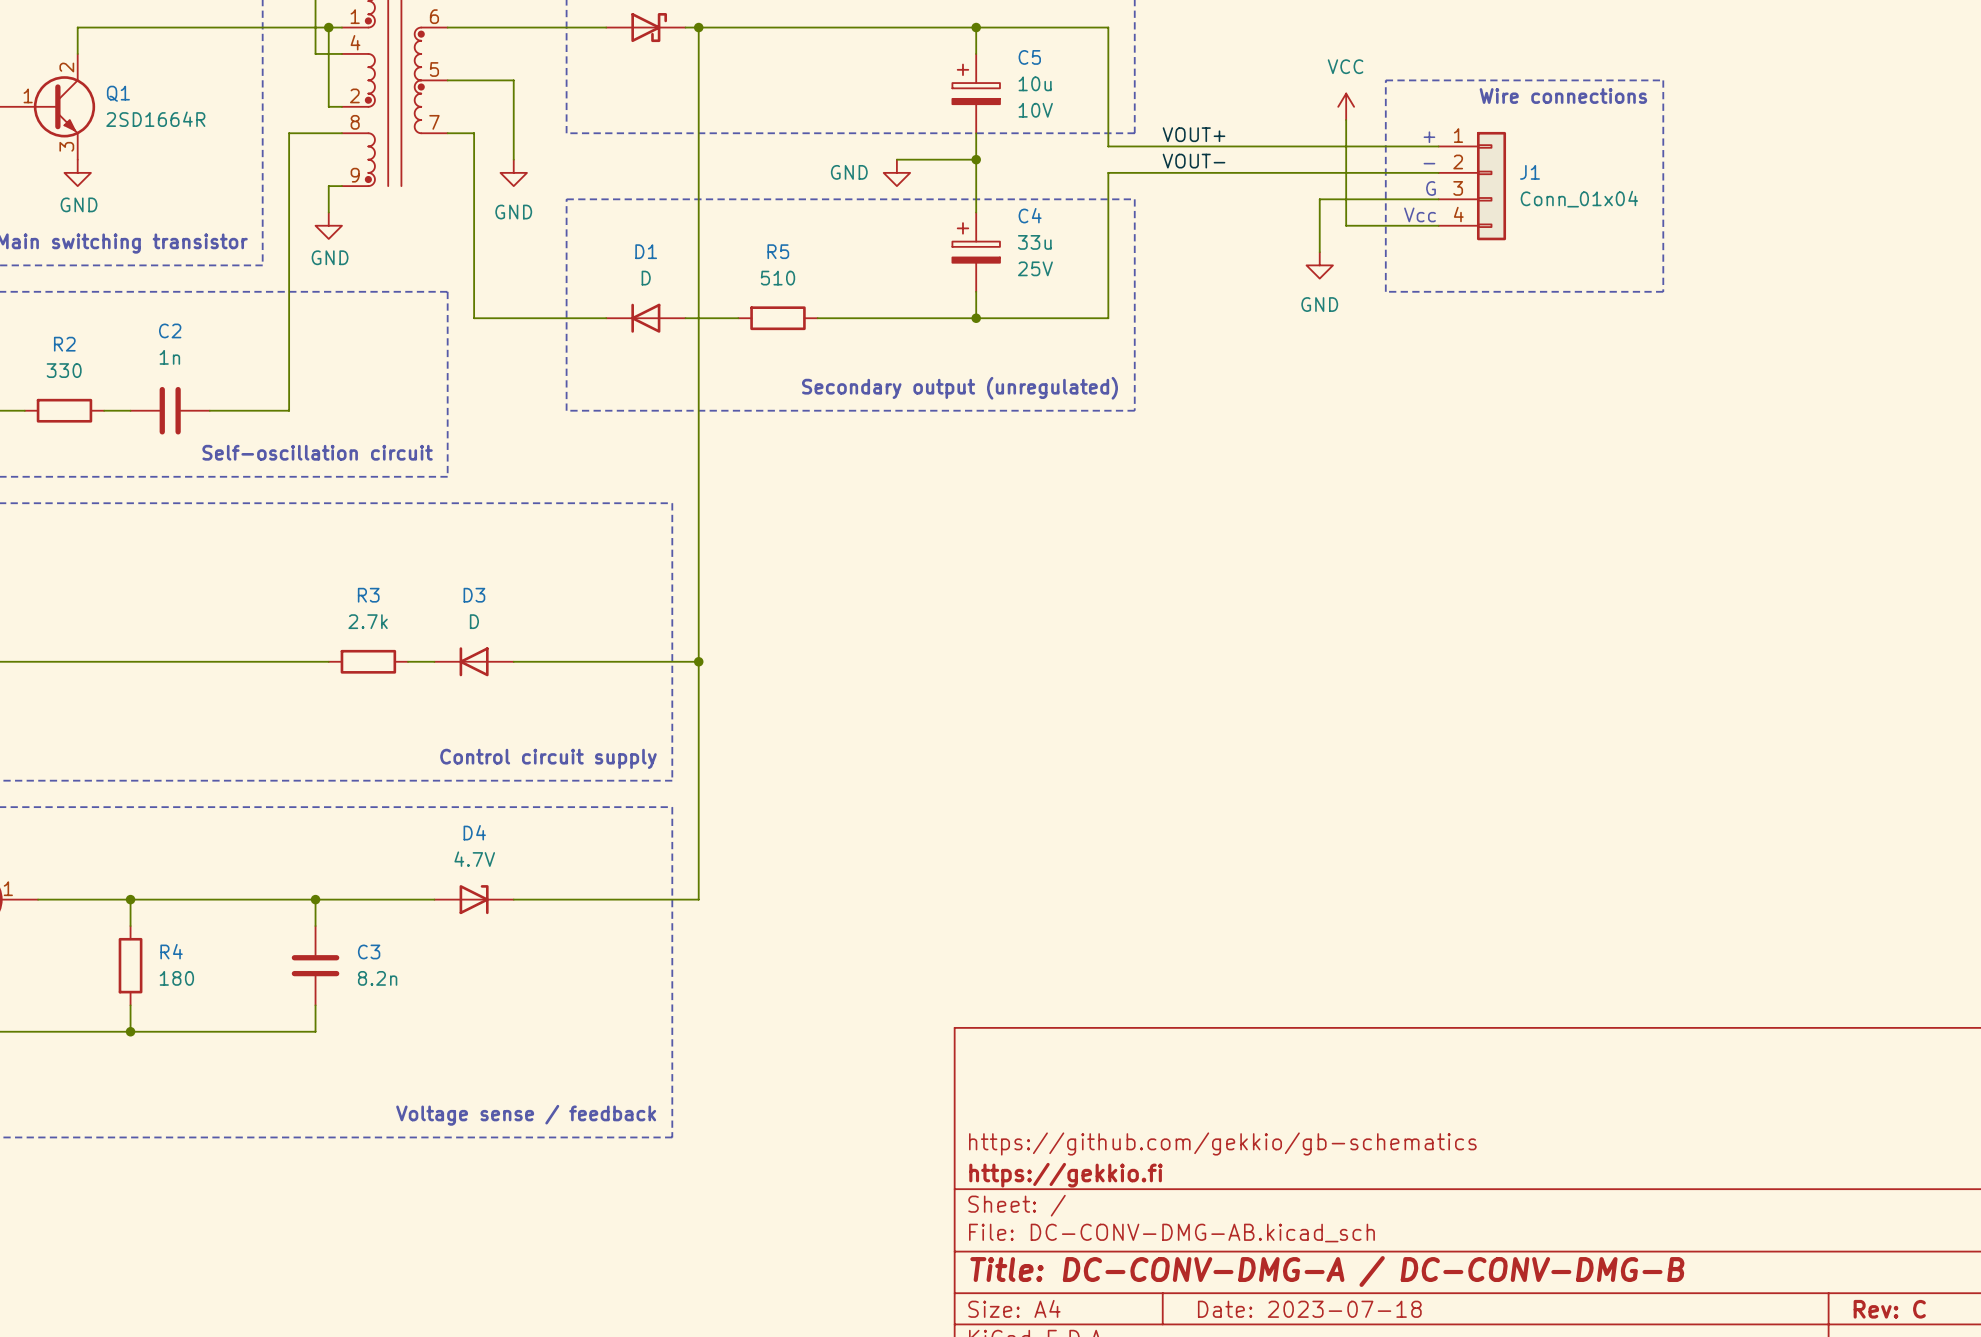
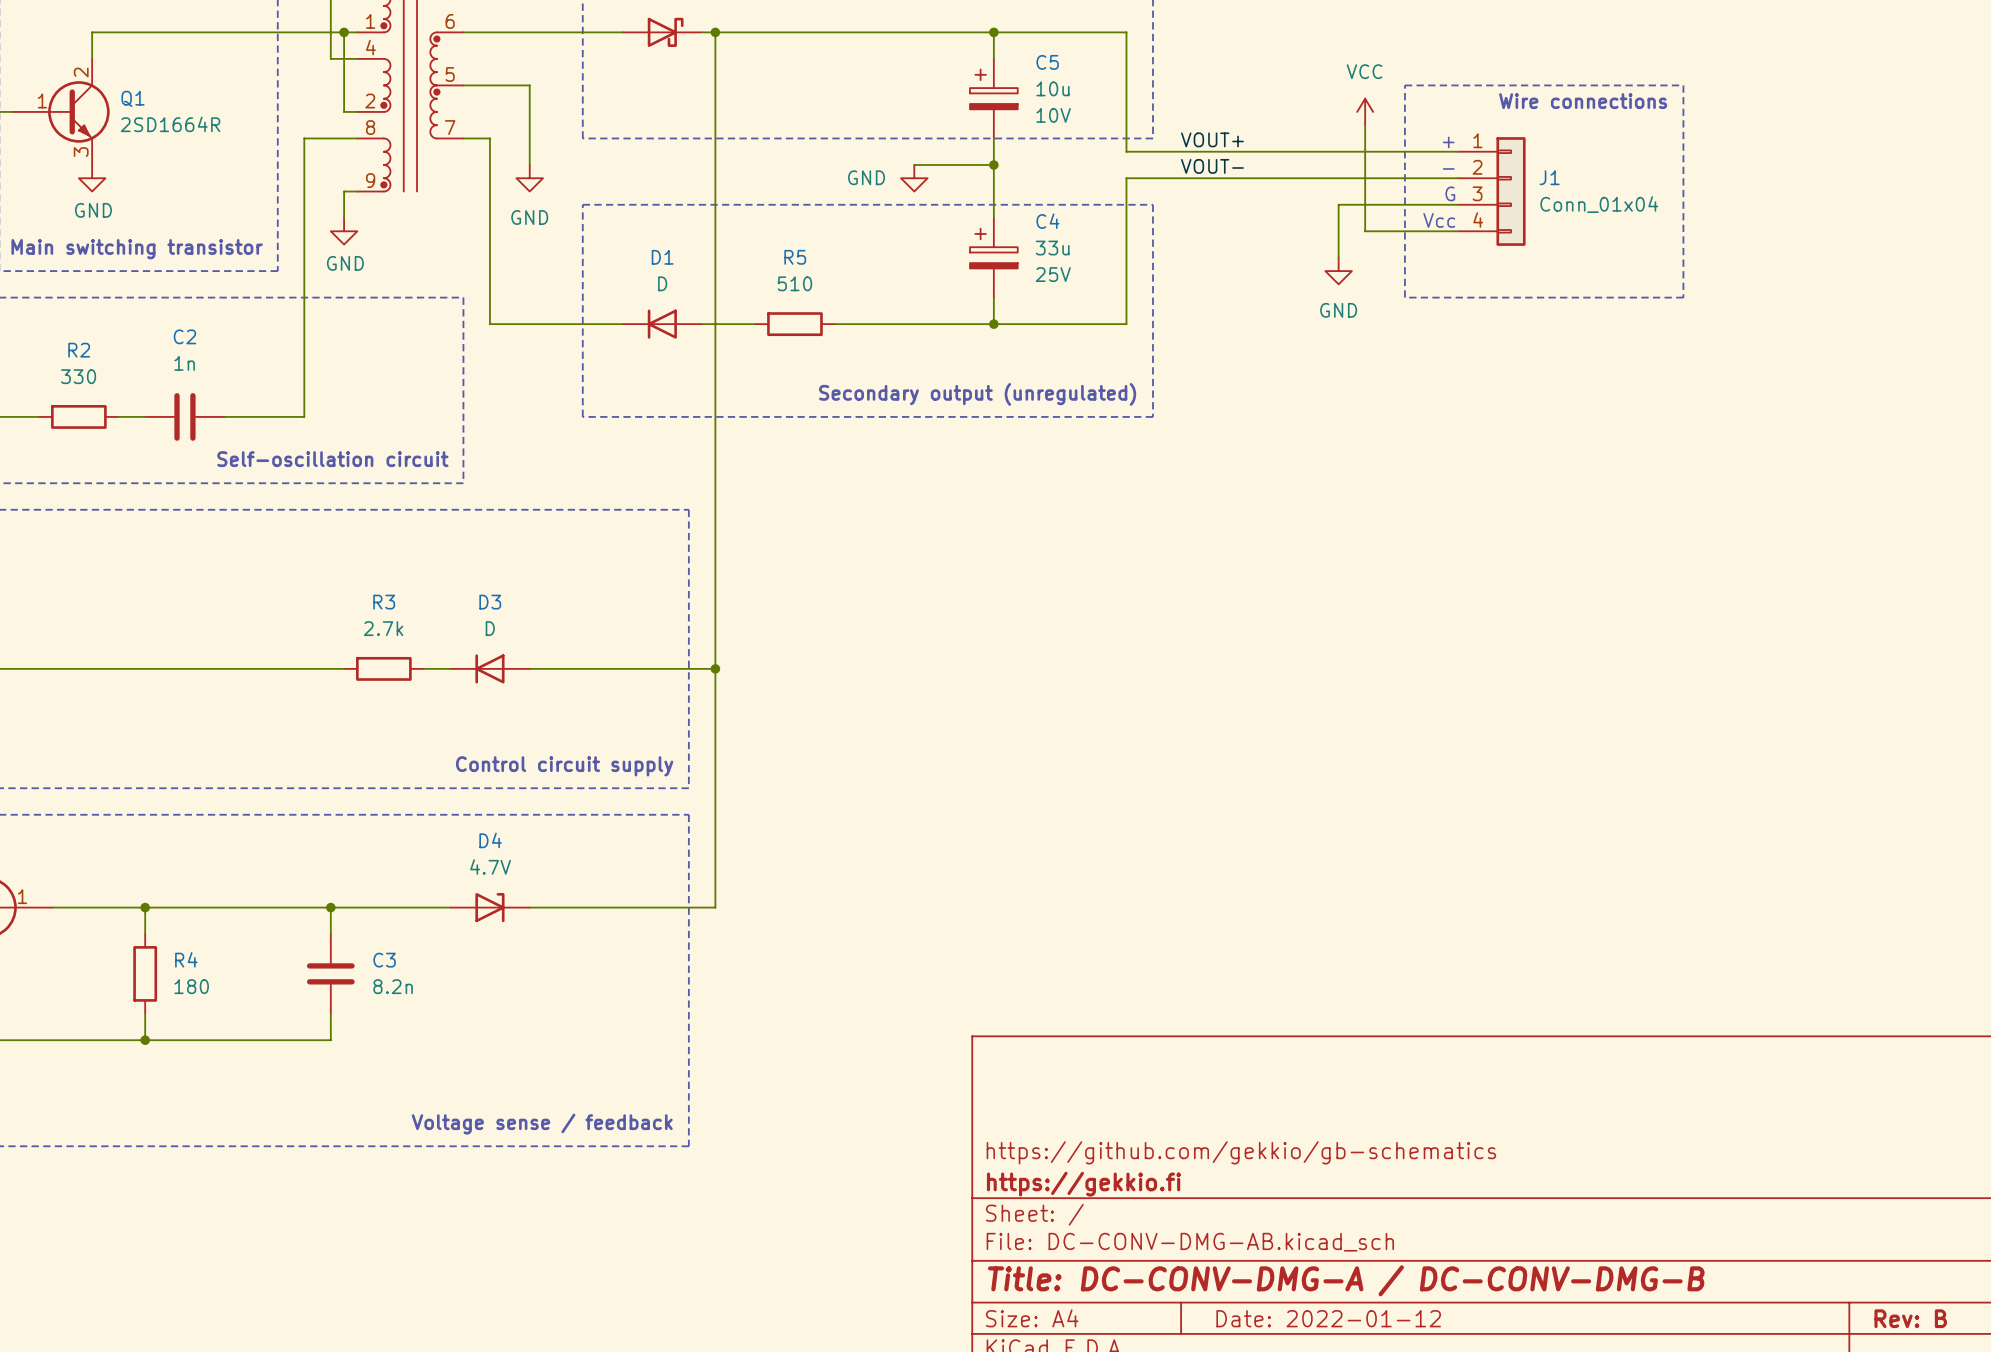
title block: Date: 2023-07-18 (1309, 1309) -> Date: 2022-01-12 (1328, 1318)
title block: Rev: C (1889, 1309) -> Rev: B (1910, 1318)

